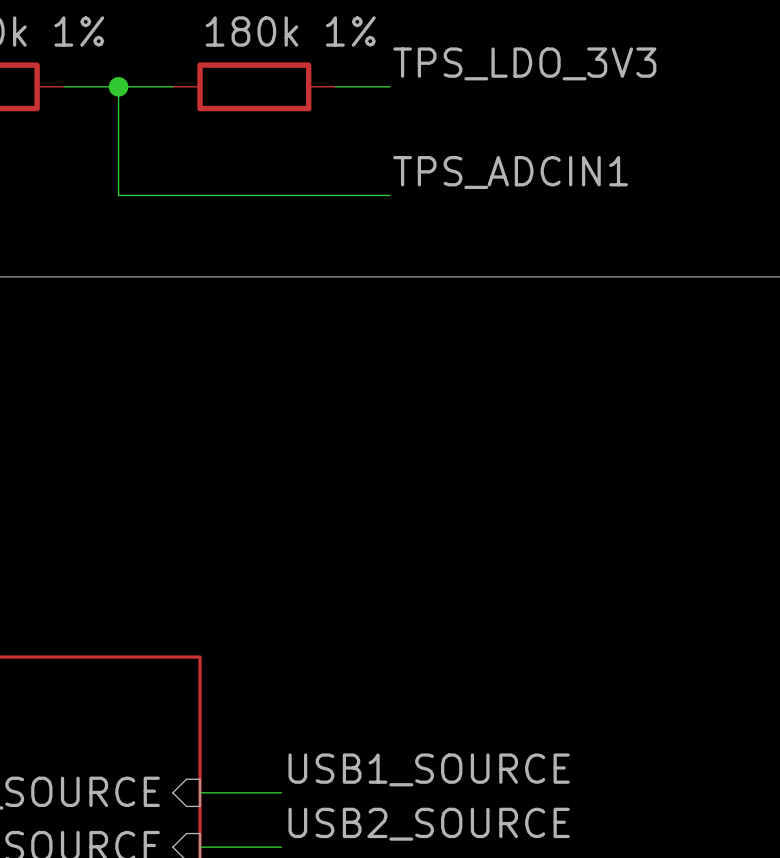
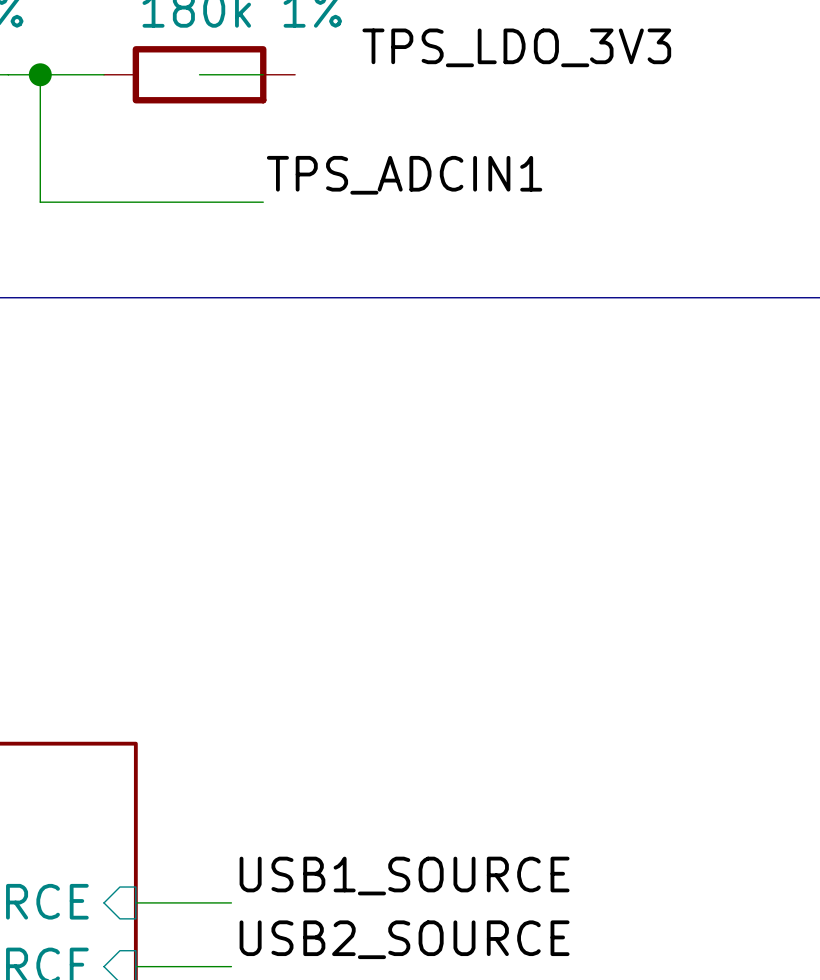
wire: (335, 86) (390, 86) -> (199, 74) (263, 74)
label position: TPS_ADCIN1 (510, 172) -> TPS_ADCIN1 (404, 175)
wire: (308, 195) (390, 195) -> none

